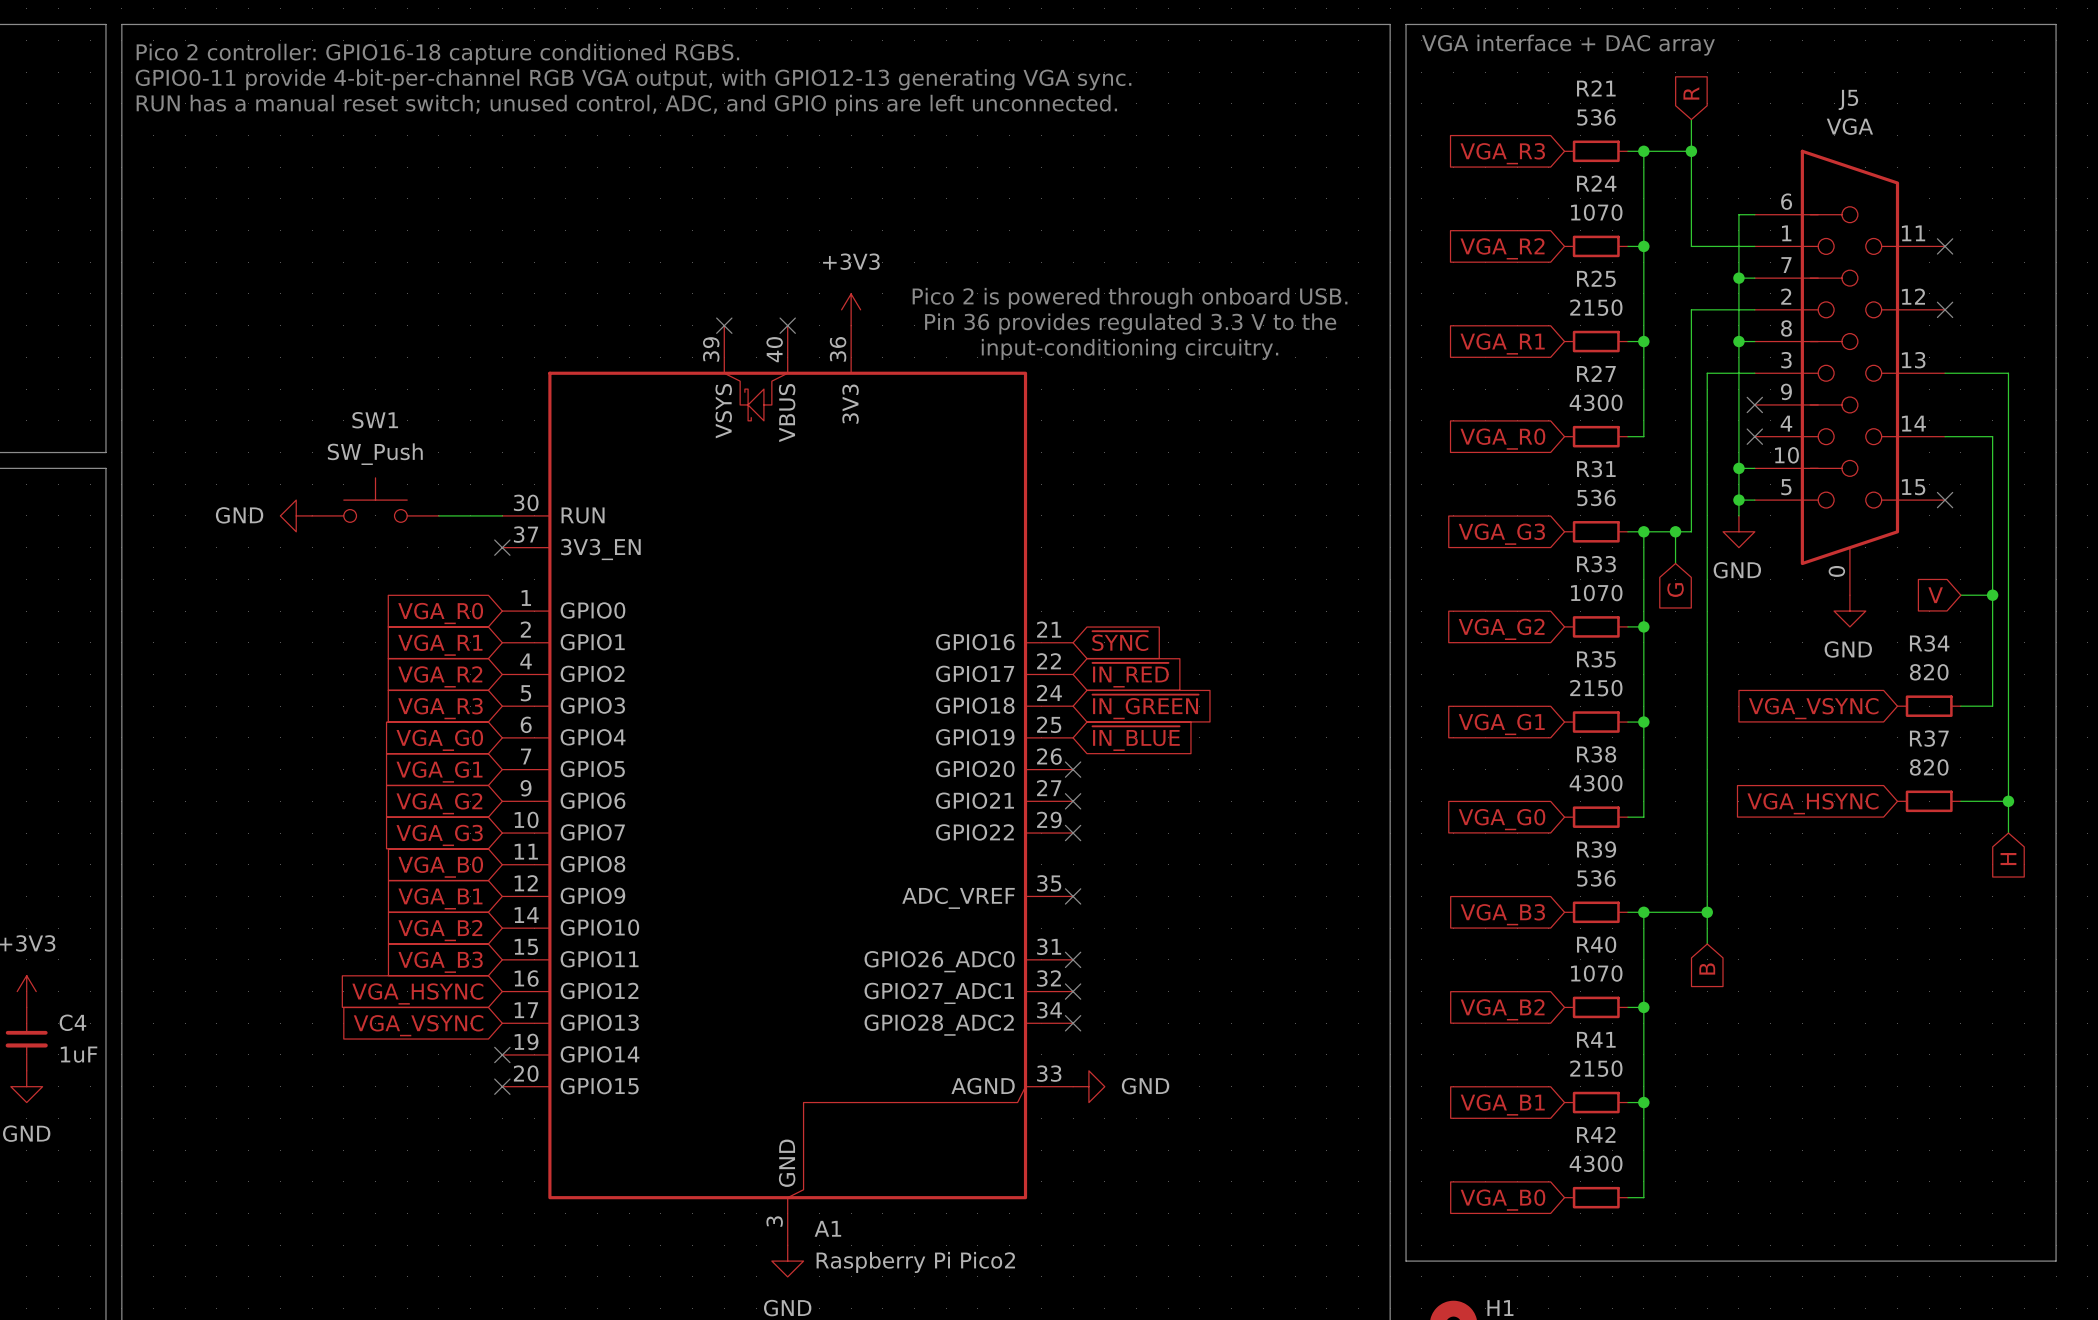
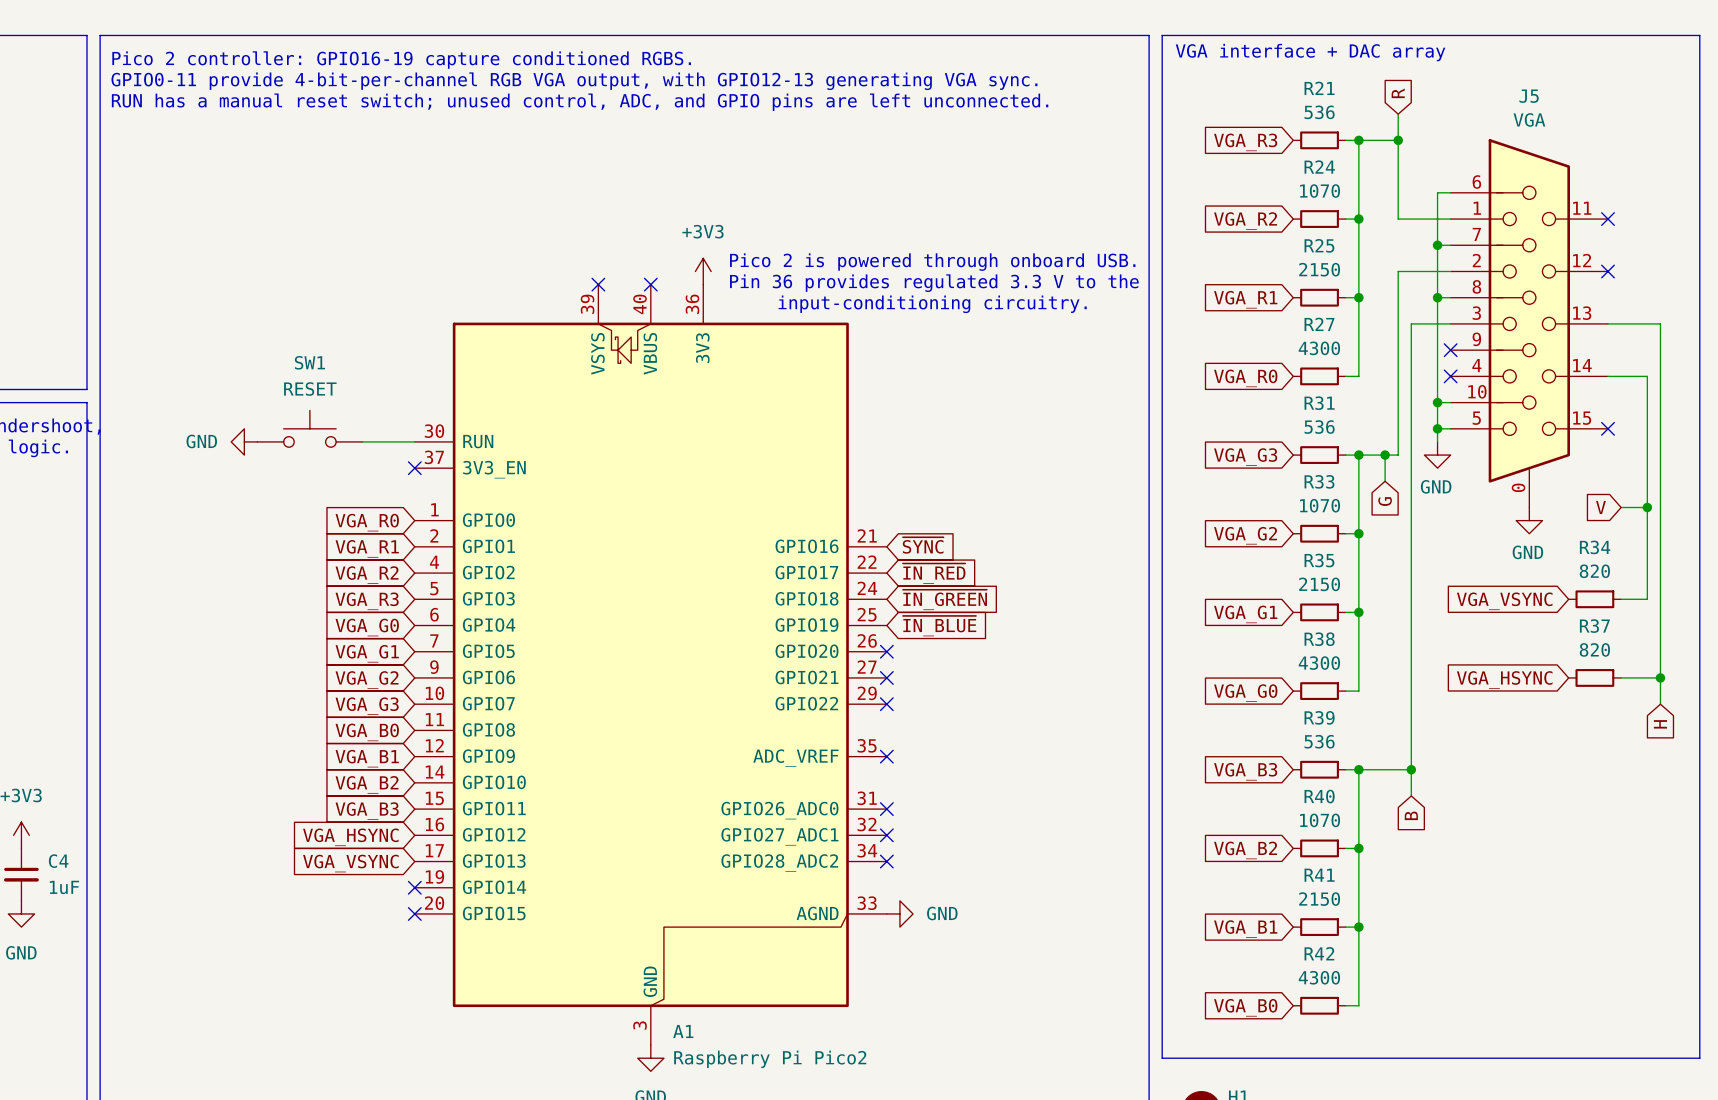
text: Pico 2 controller: GPIO16-18 capture conditioned RGBS. (437, 54) -> Pico 2 controller: GPIO16-19 capture conditioned RGBS. (401, 60)
SW1 value: SW_Push (375, 454) -> RESET (310, 389)

